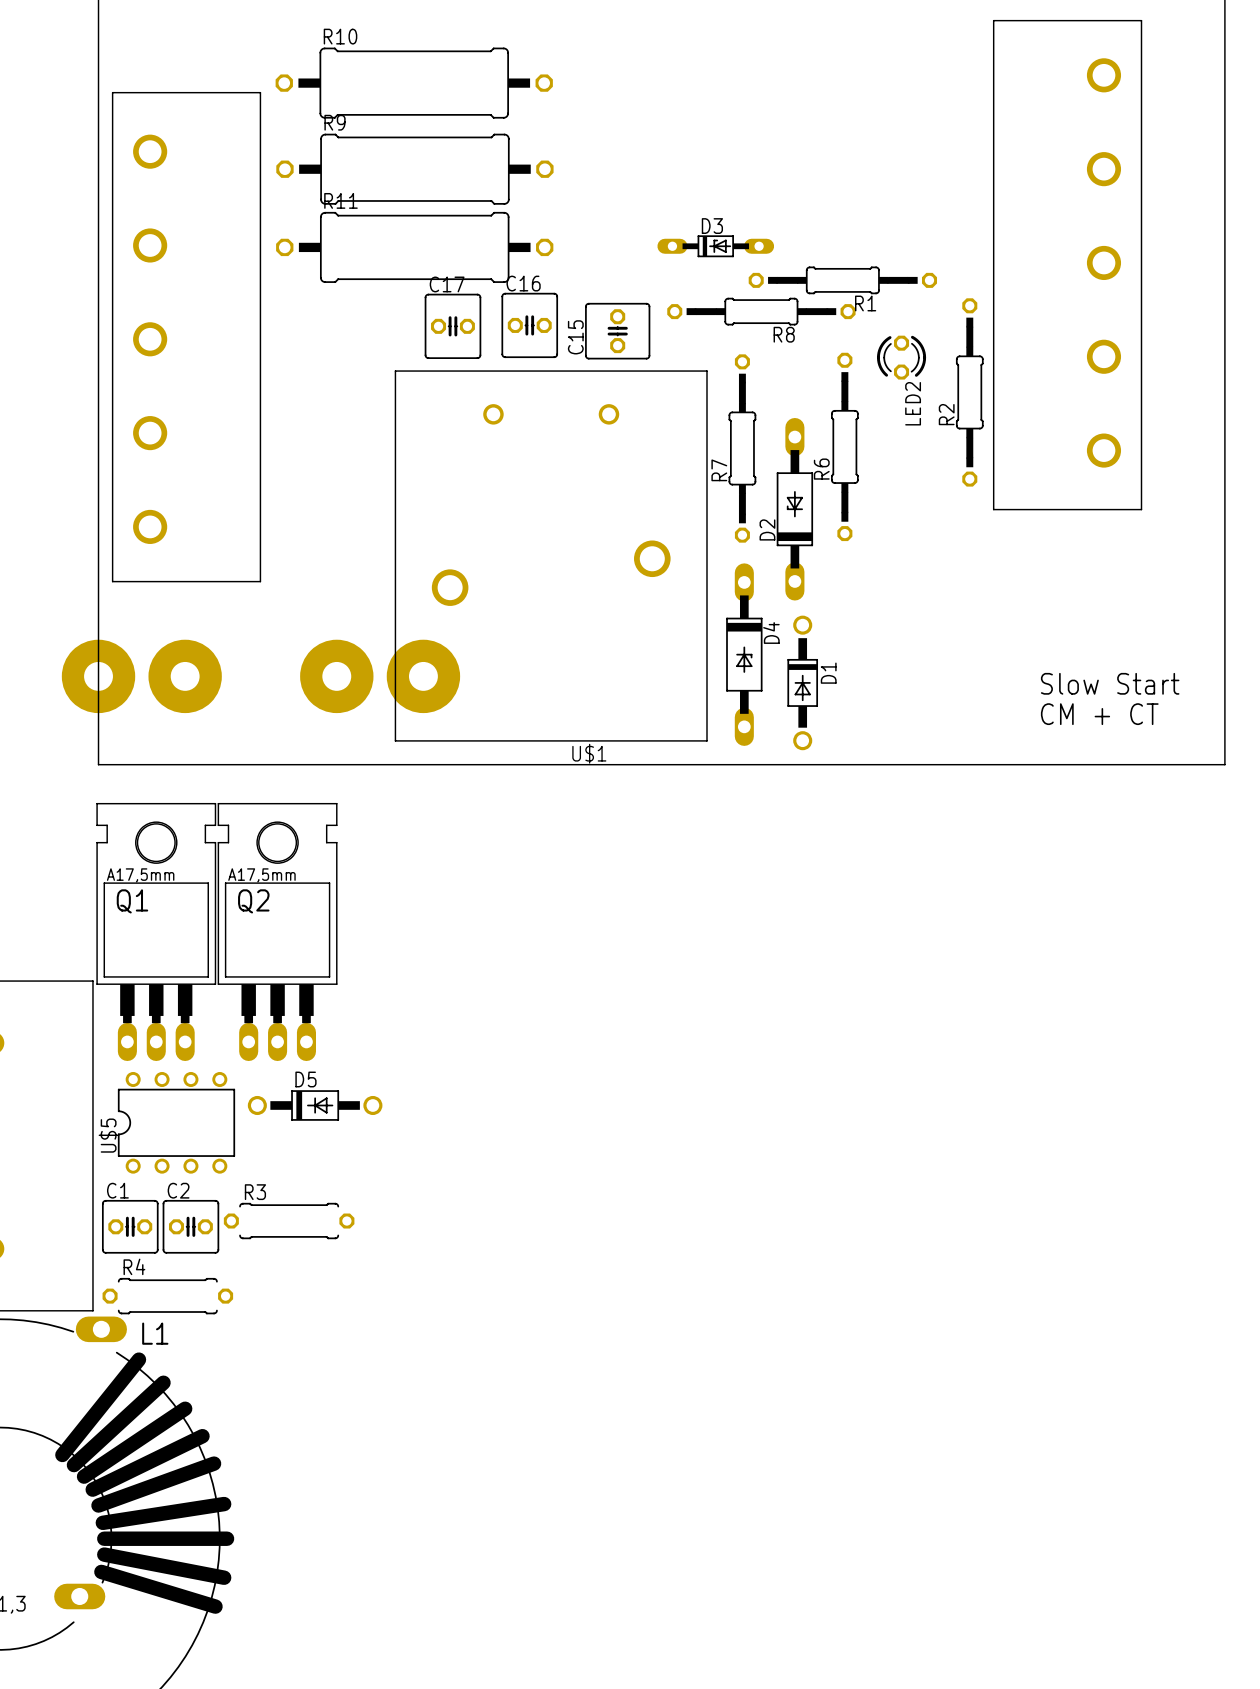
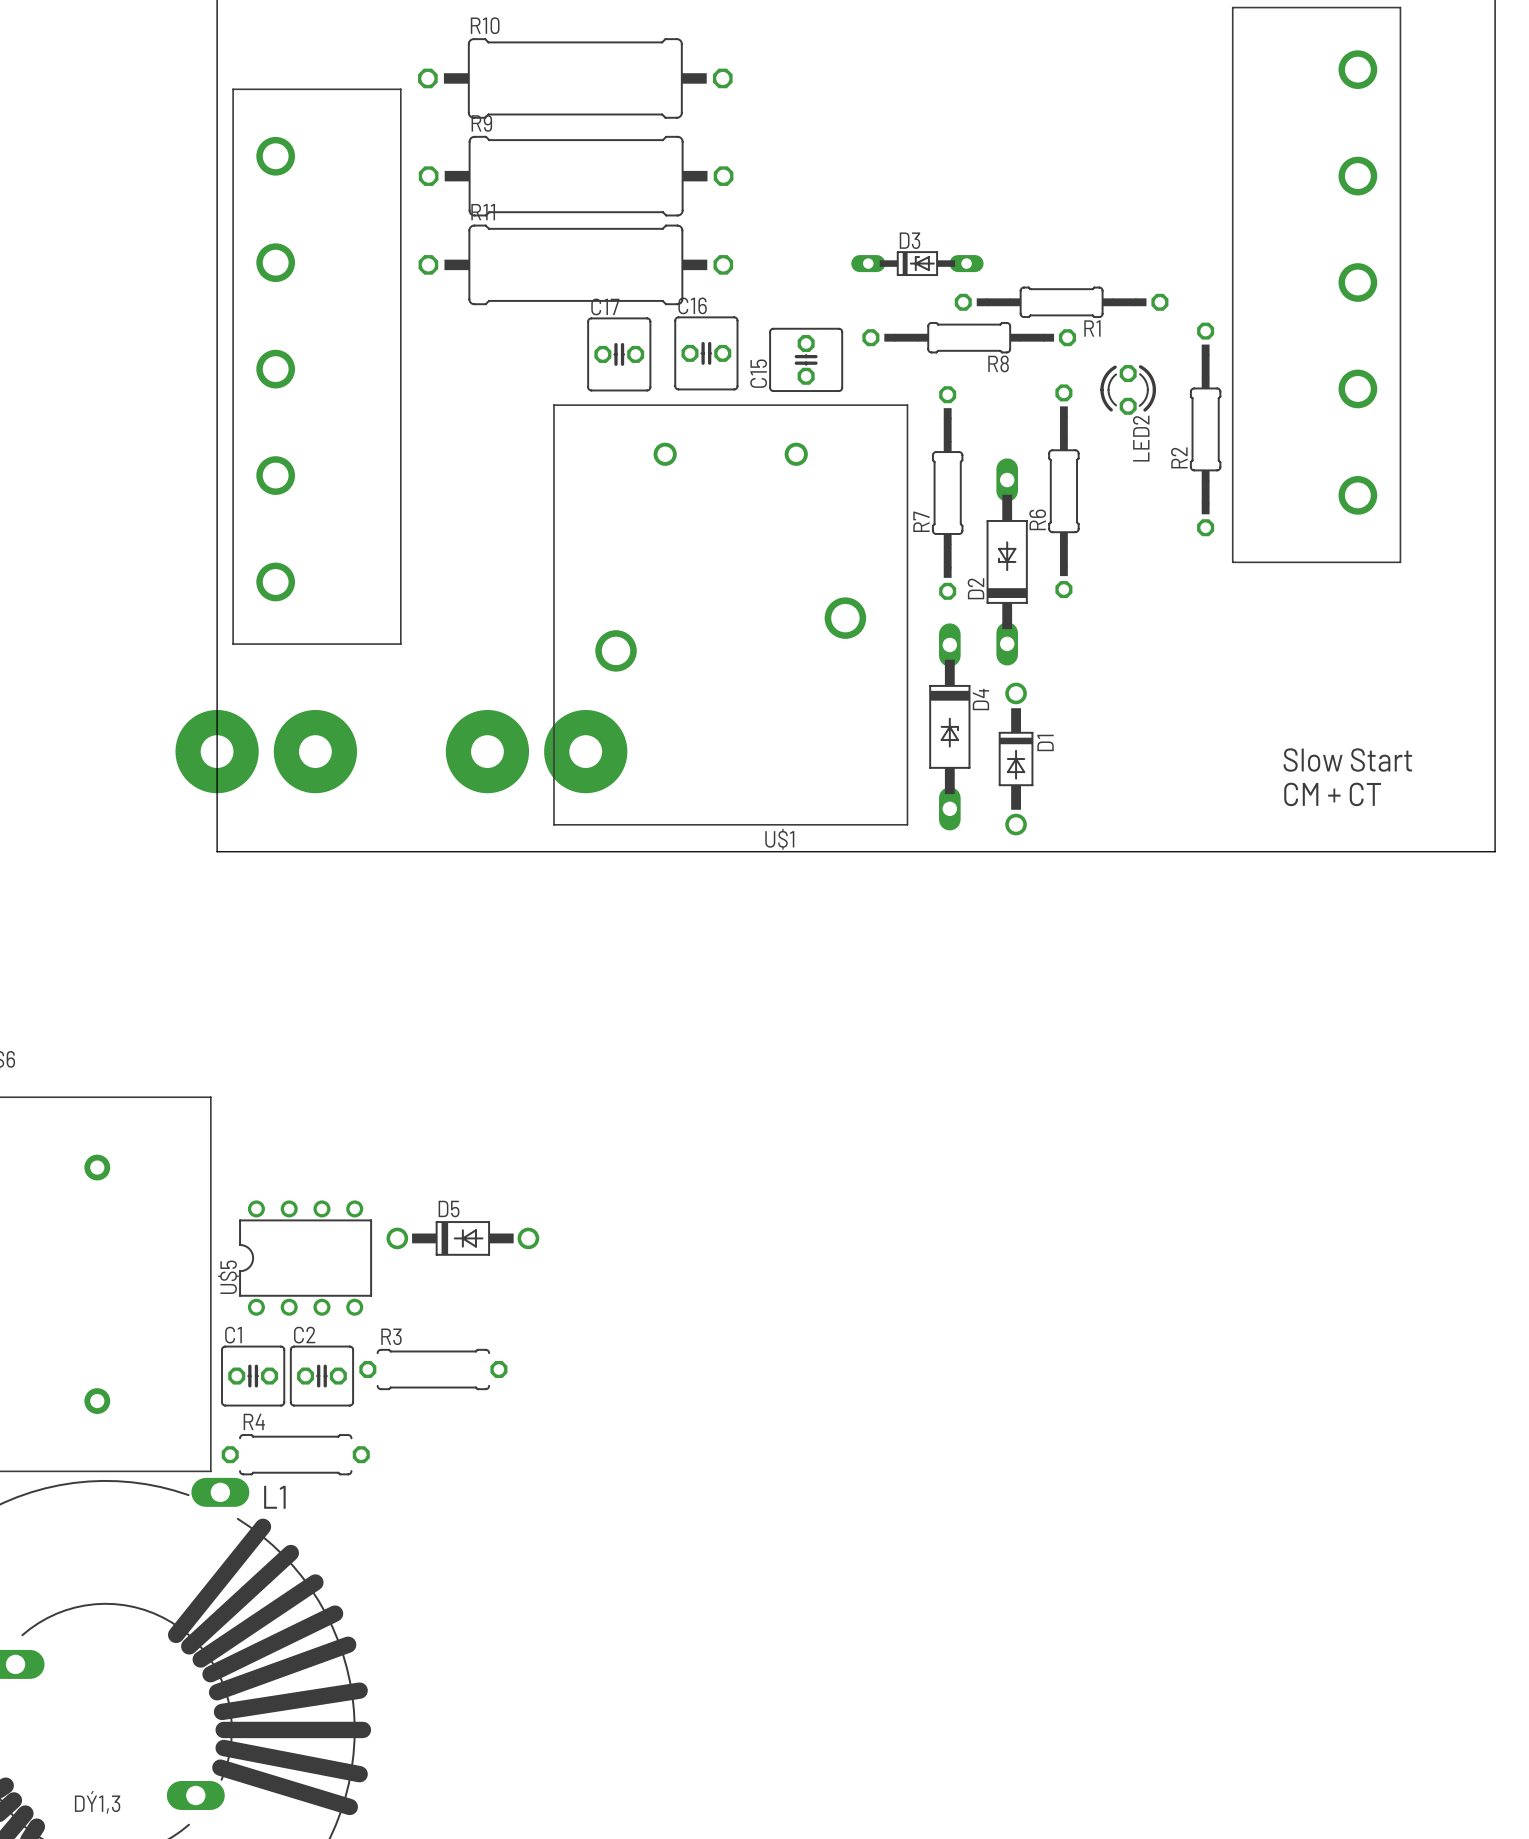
Q1: (156, 931) -> none
Q2: (277, 931) -> none

